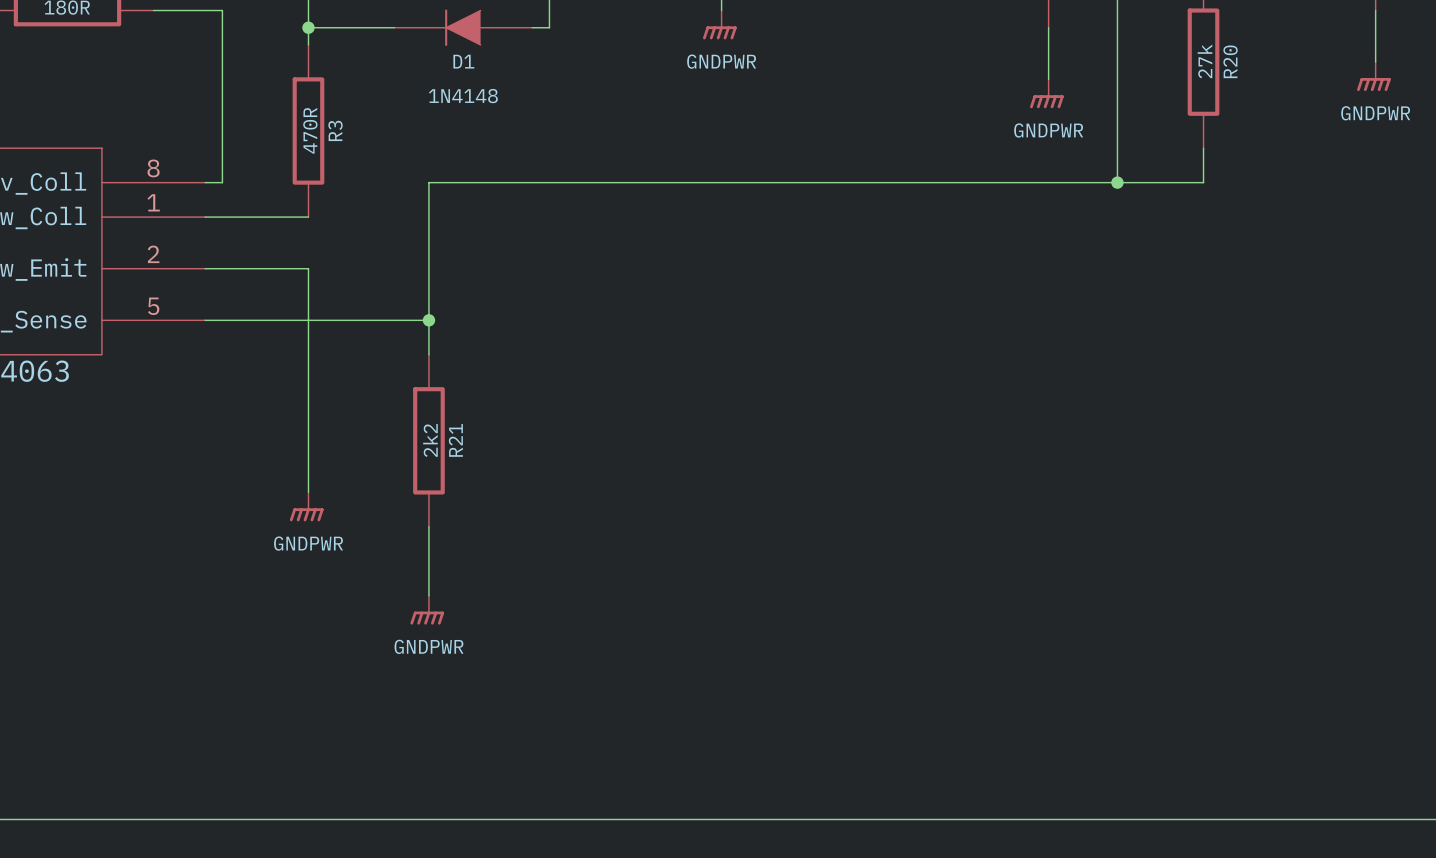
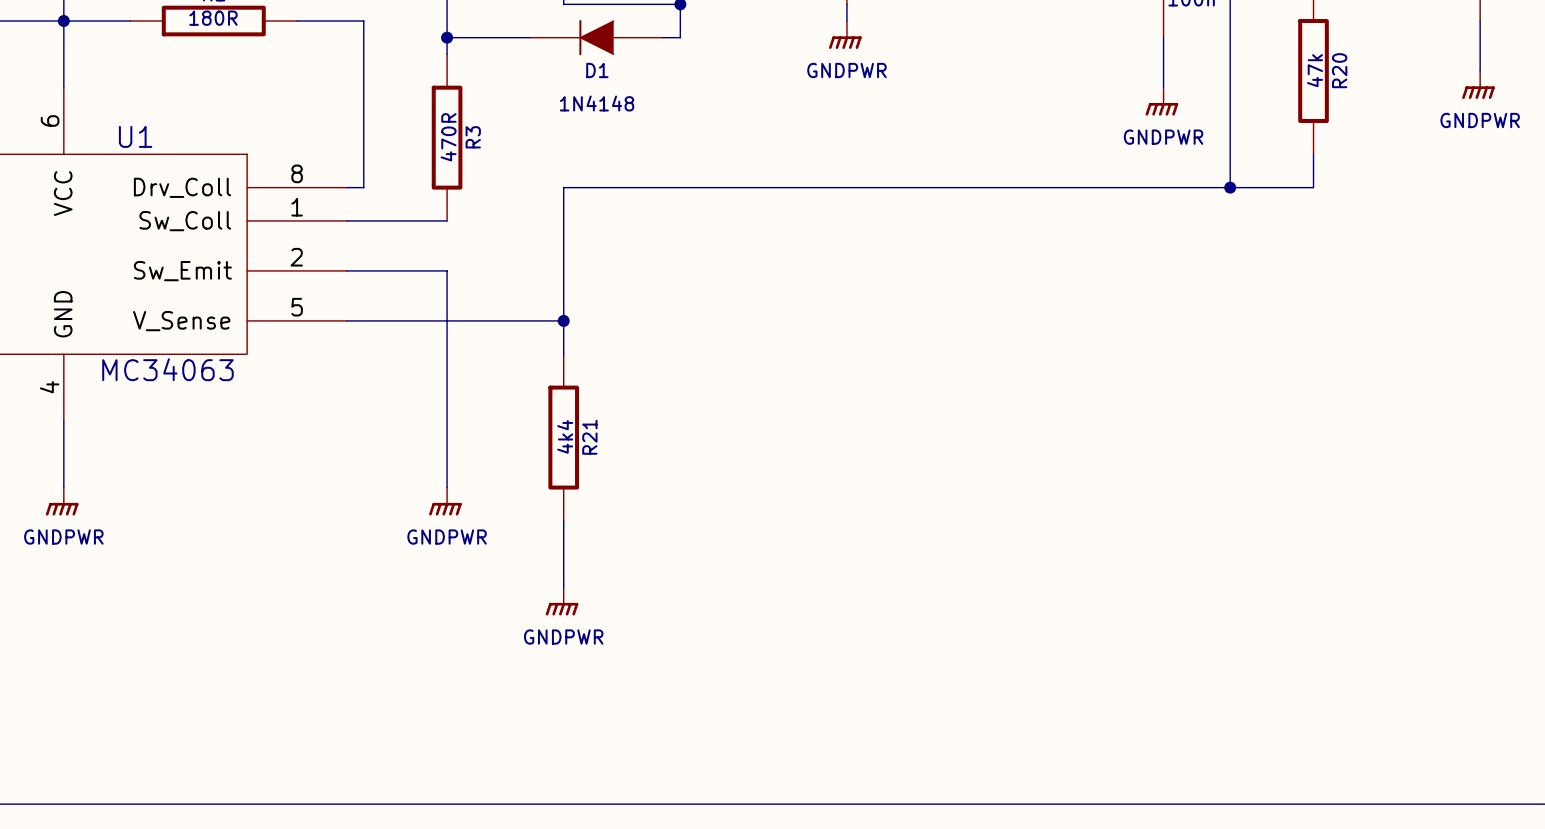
R20 value: 27k (1205, 61) -> 47k (1315, 70)
R21 value: 2k2 (430, 440) -> 4k4 (565, 436)

